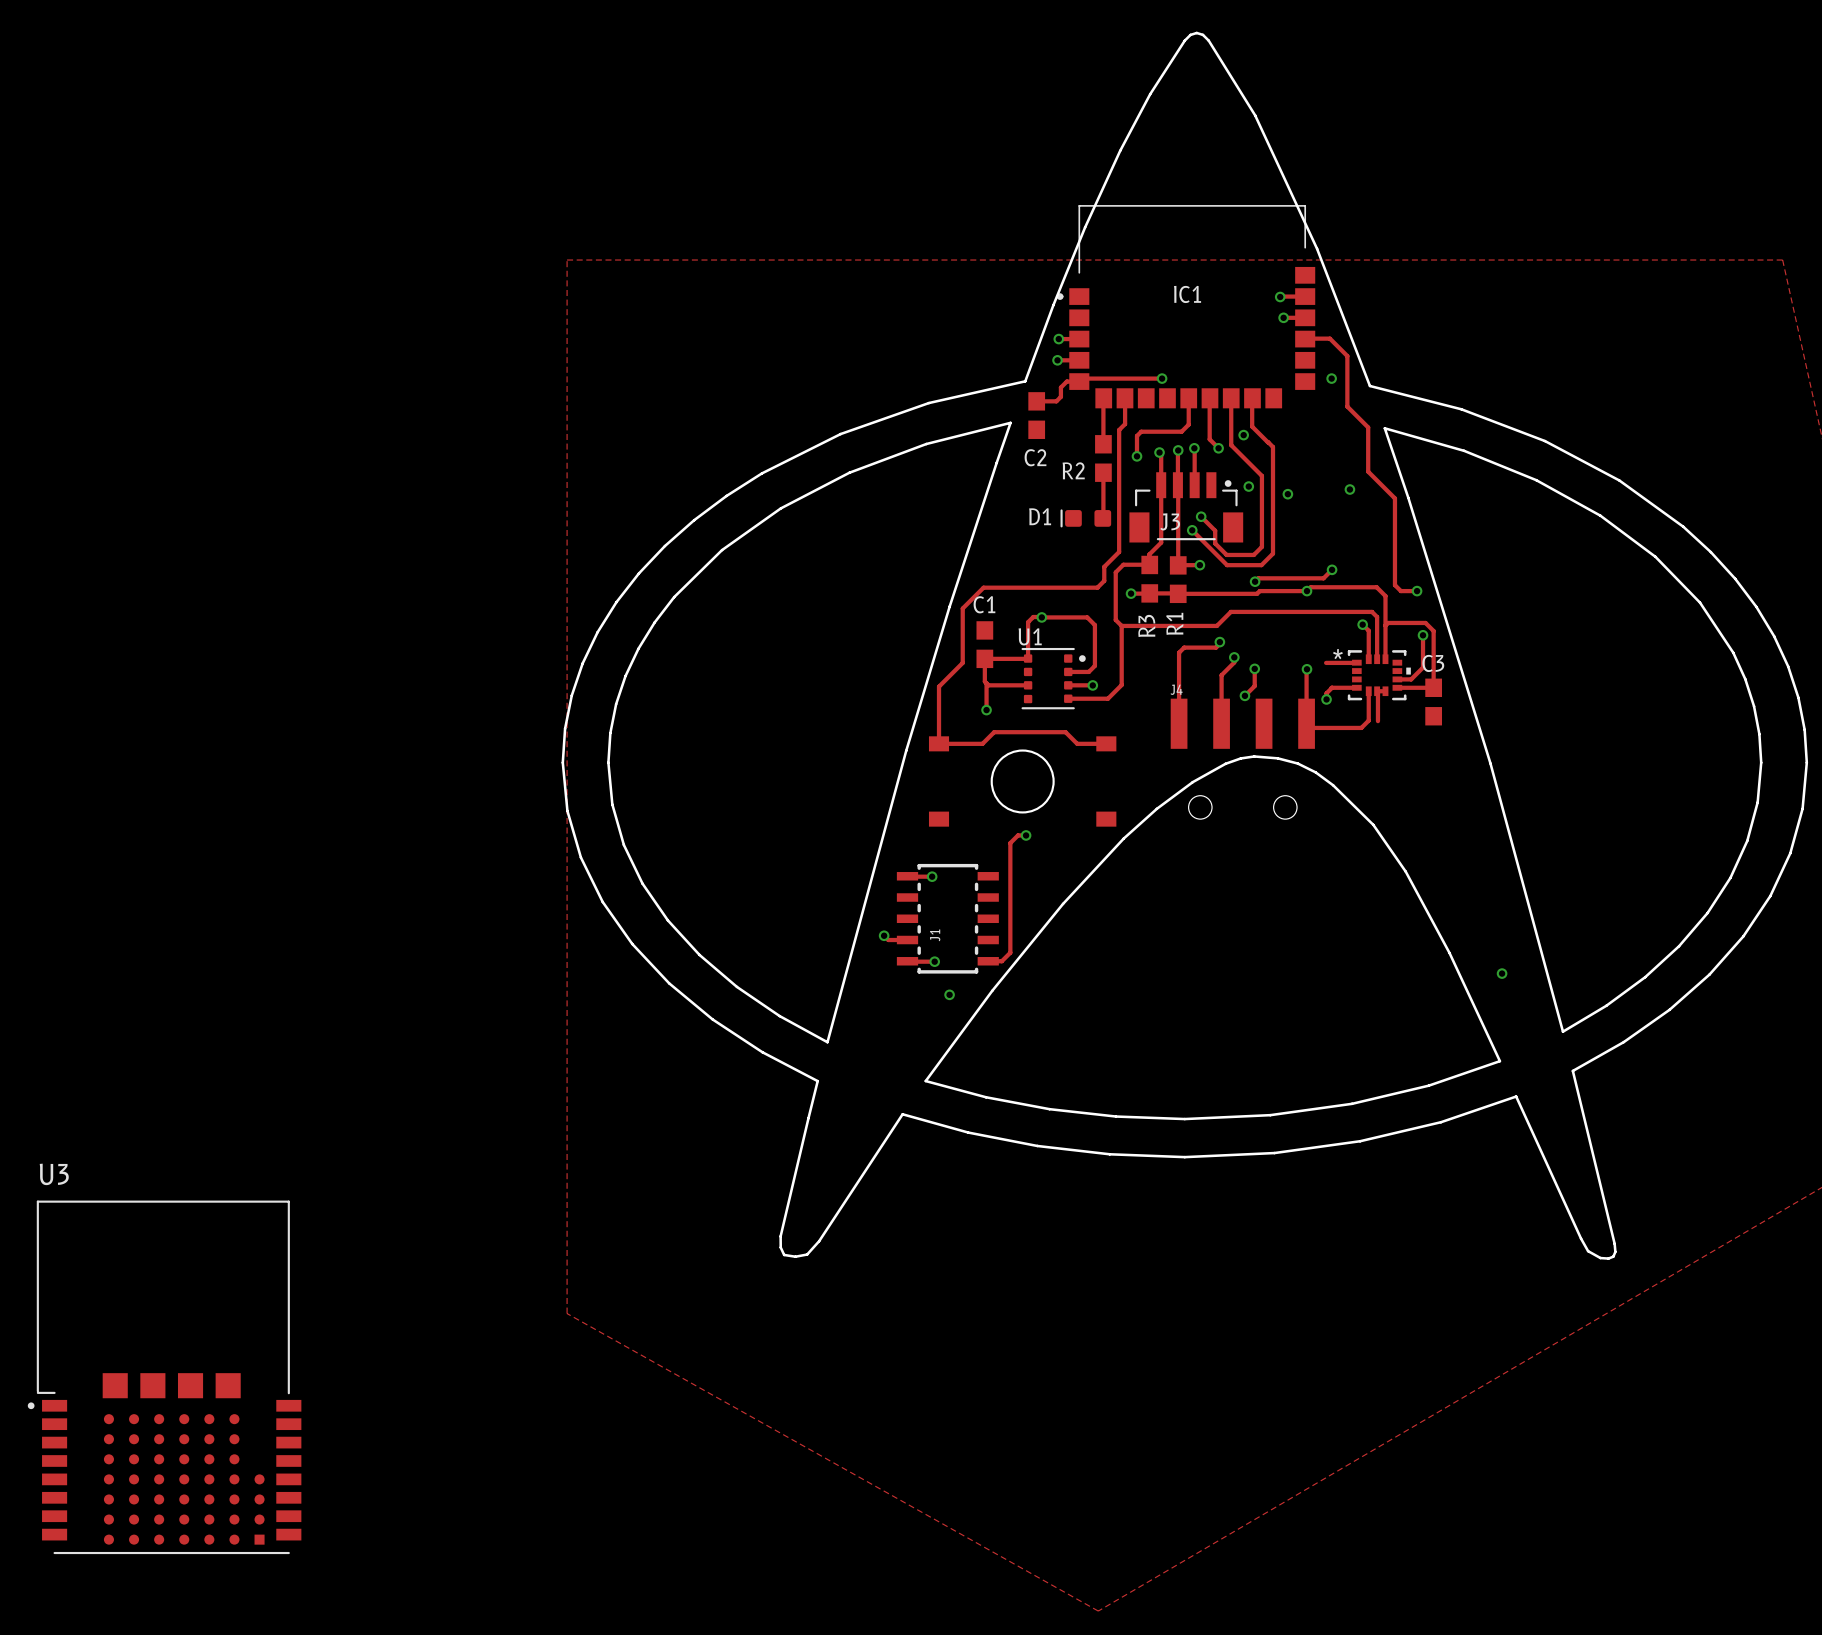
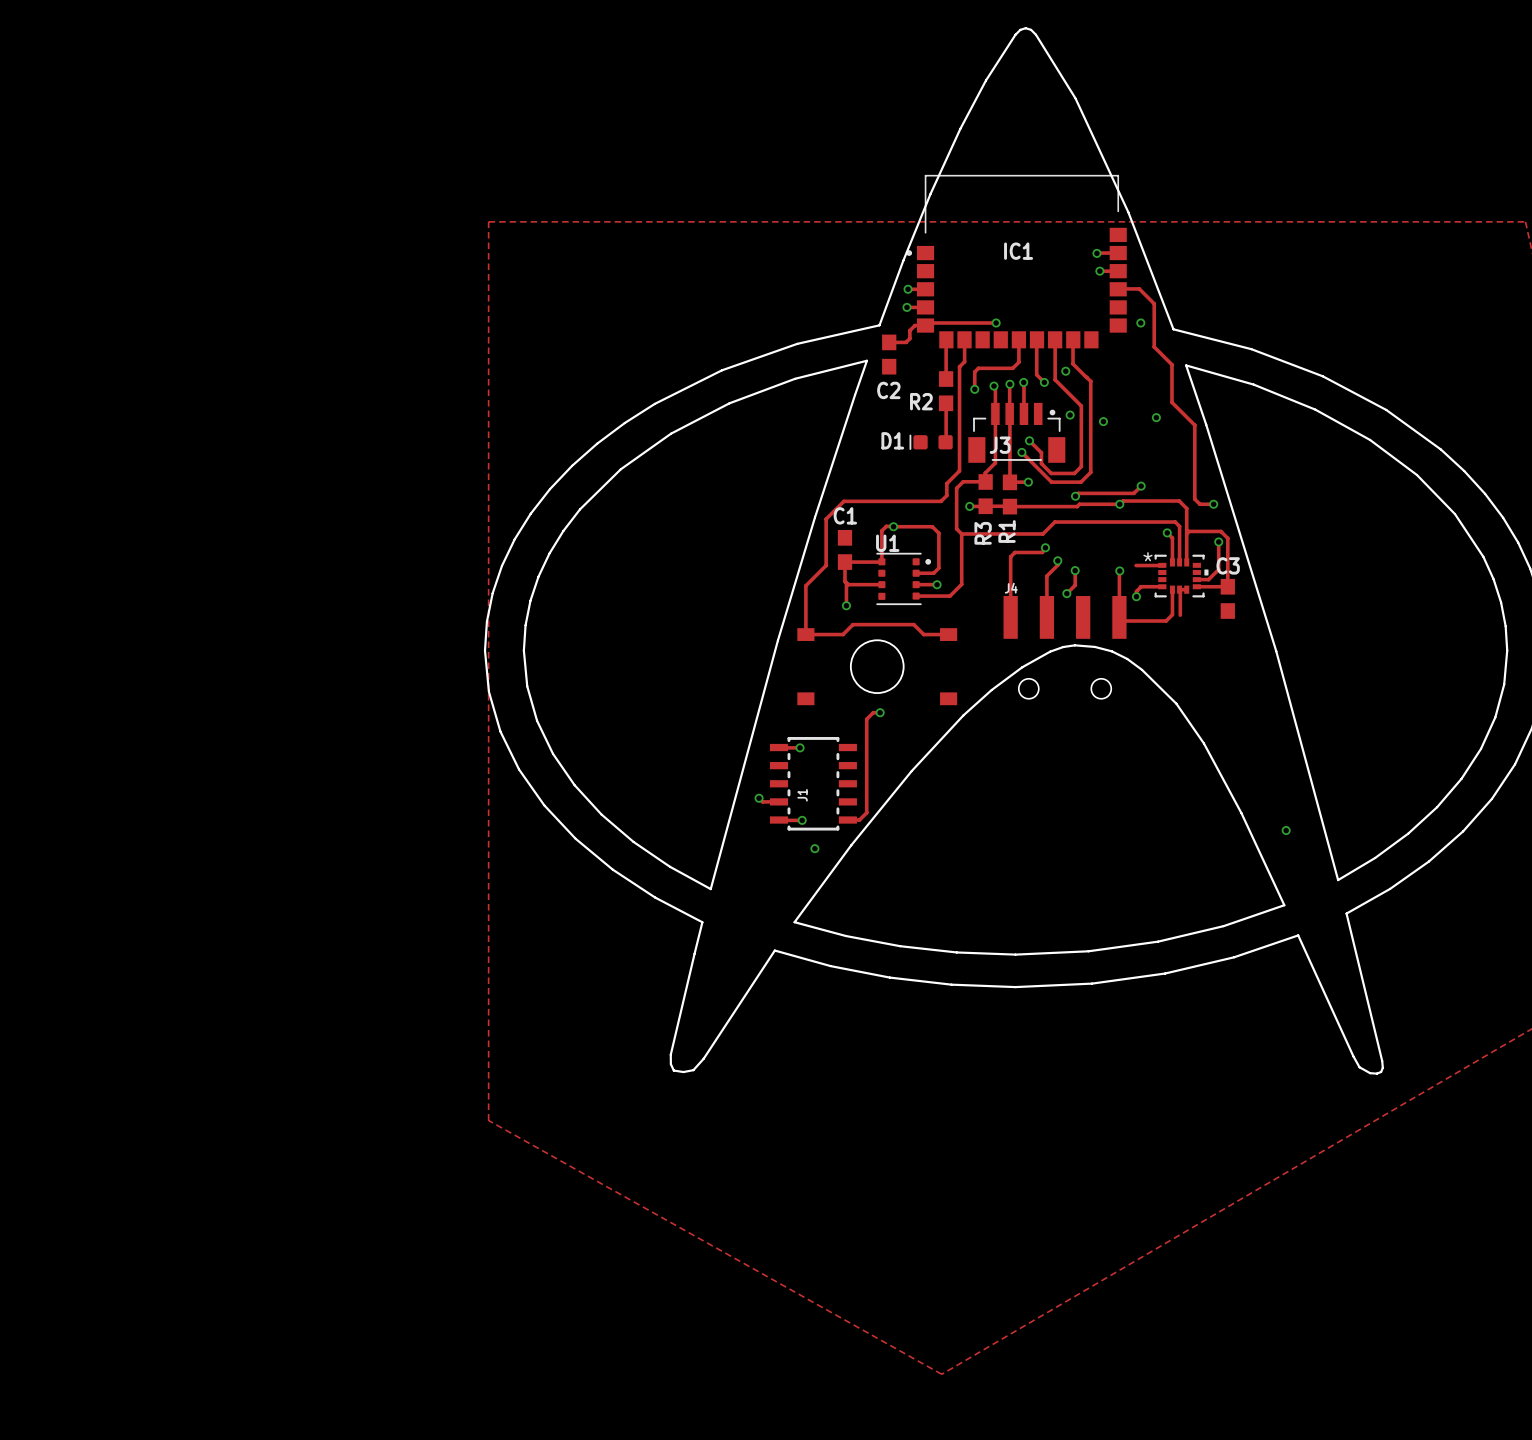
U3: (164, 1377) -> none

